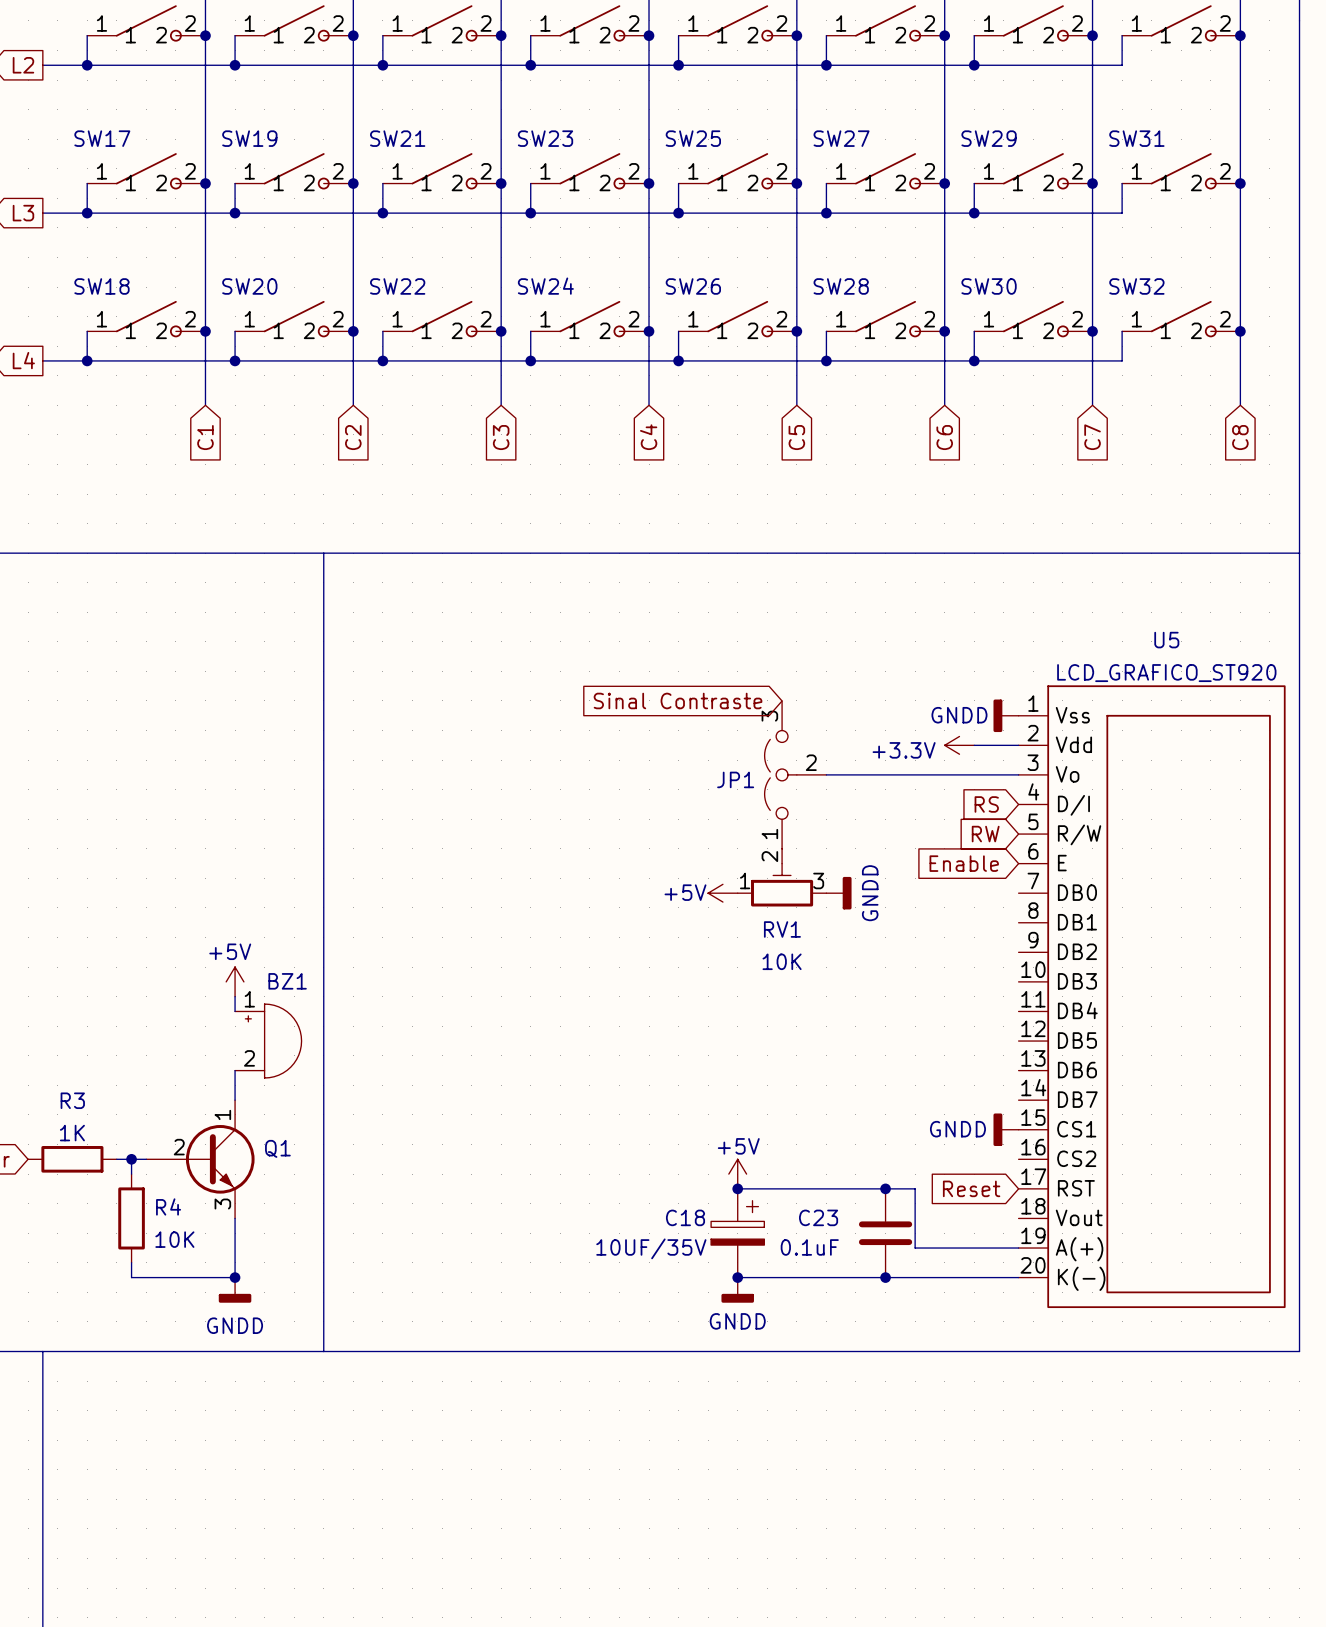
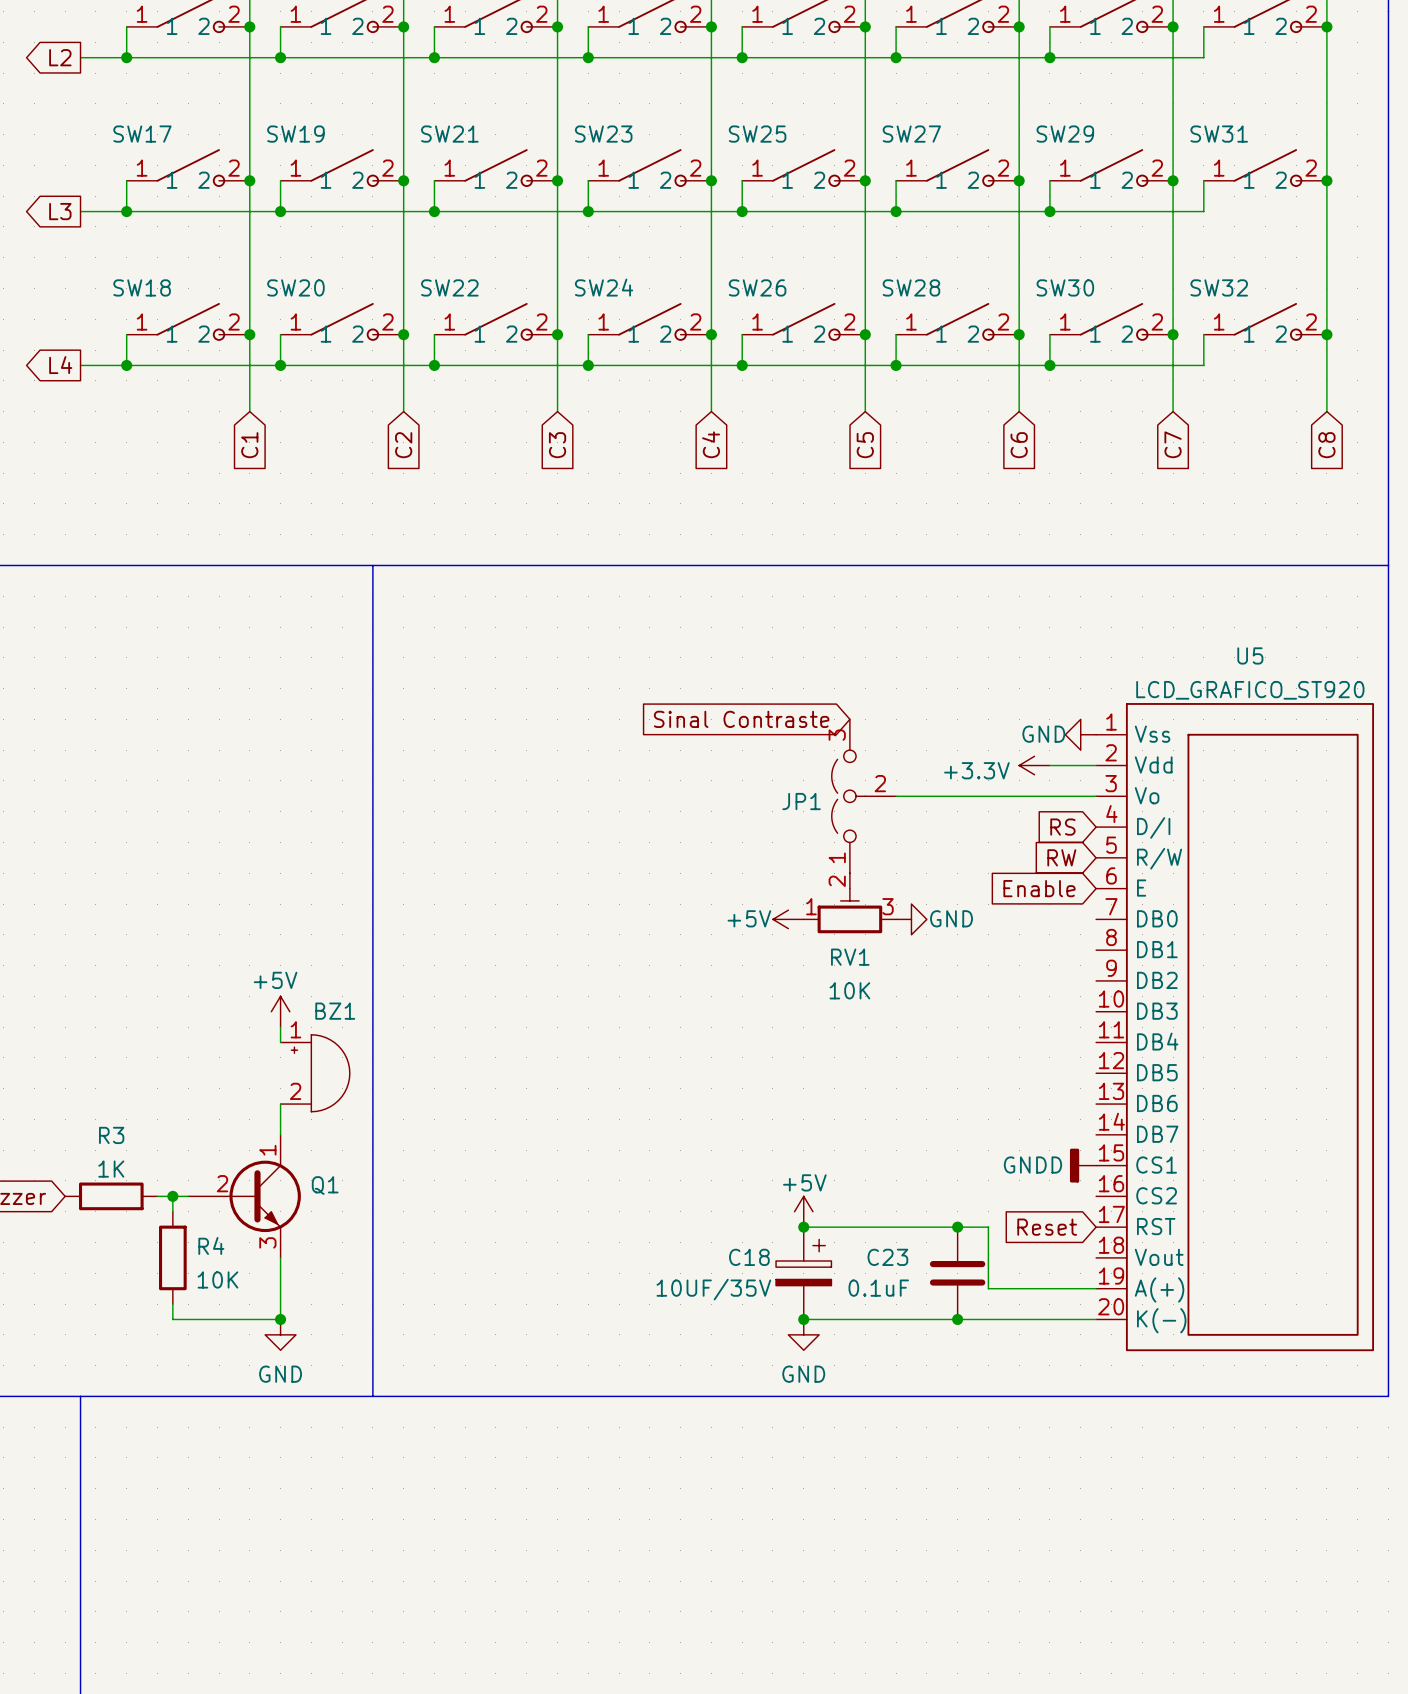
power symbol: GNDD (1006, 715) -> GND (1080, 734)
power symbol: GNDD (838, 893) -> GND (911, 919)
power symbol: GNDD (235, 1290) -> GND (280, 1334)
power symbol: GNDD (737, 1290) -> GND (803, 1334)

